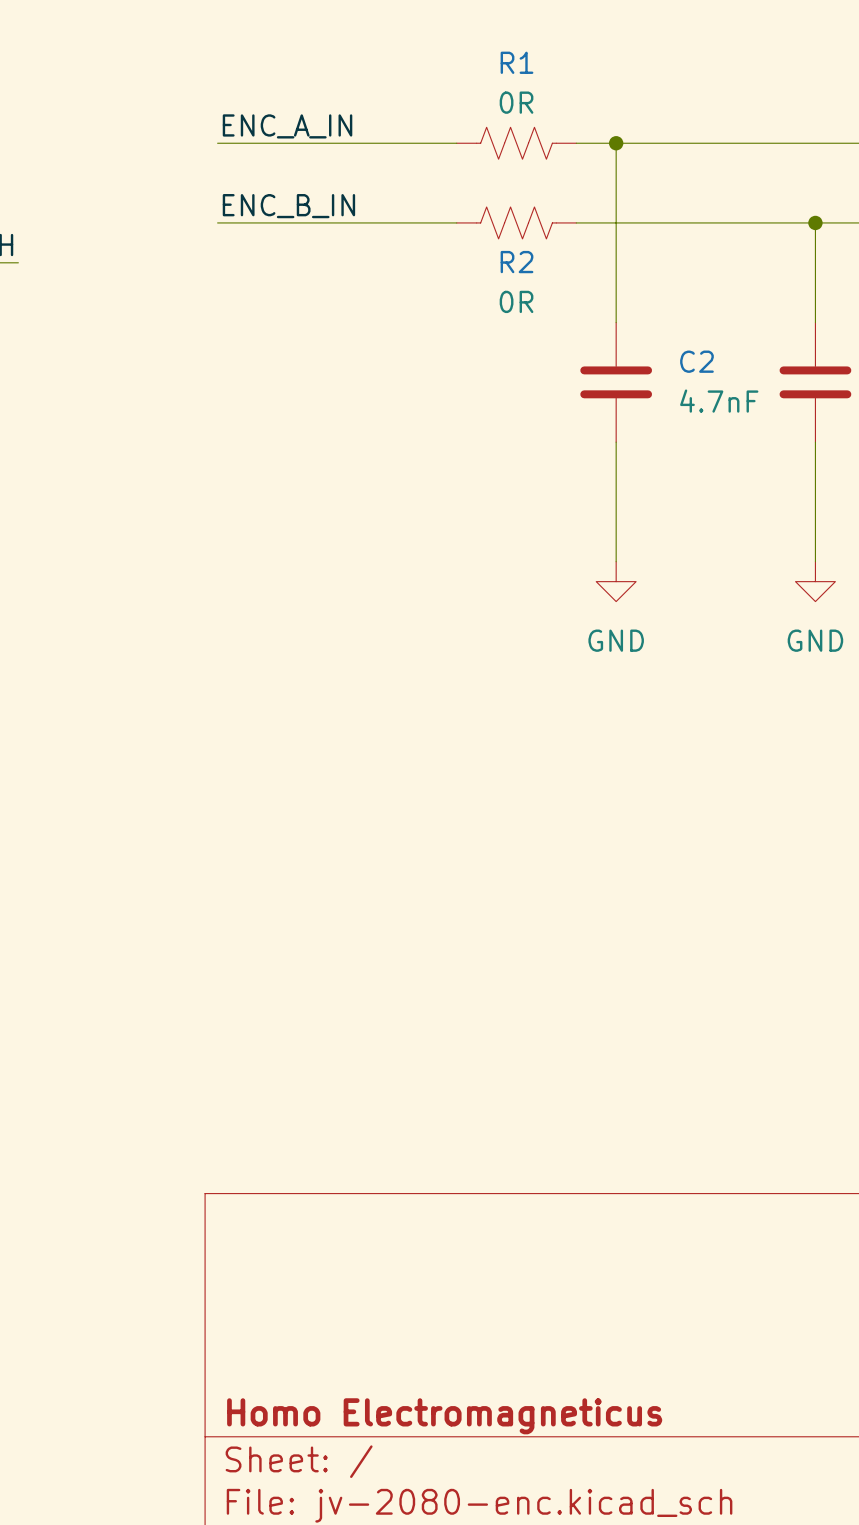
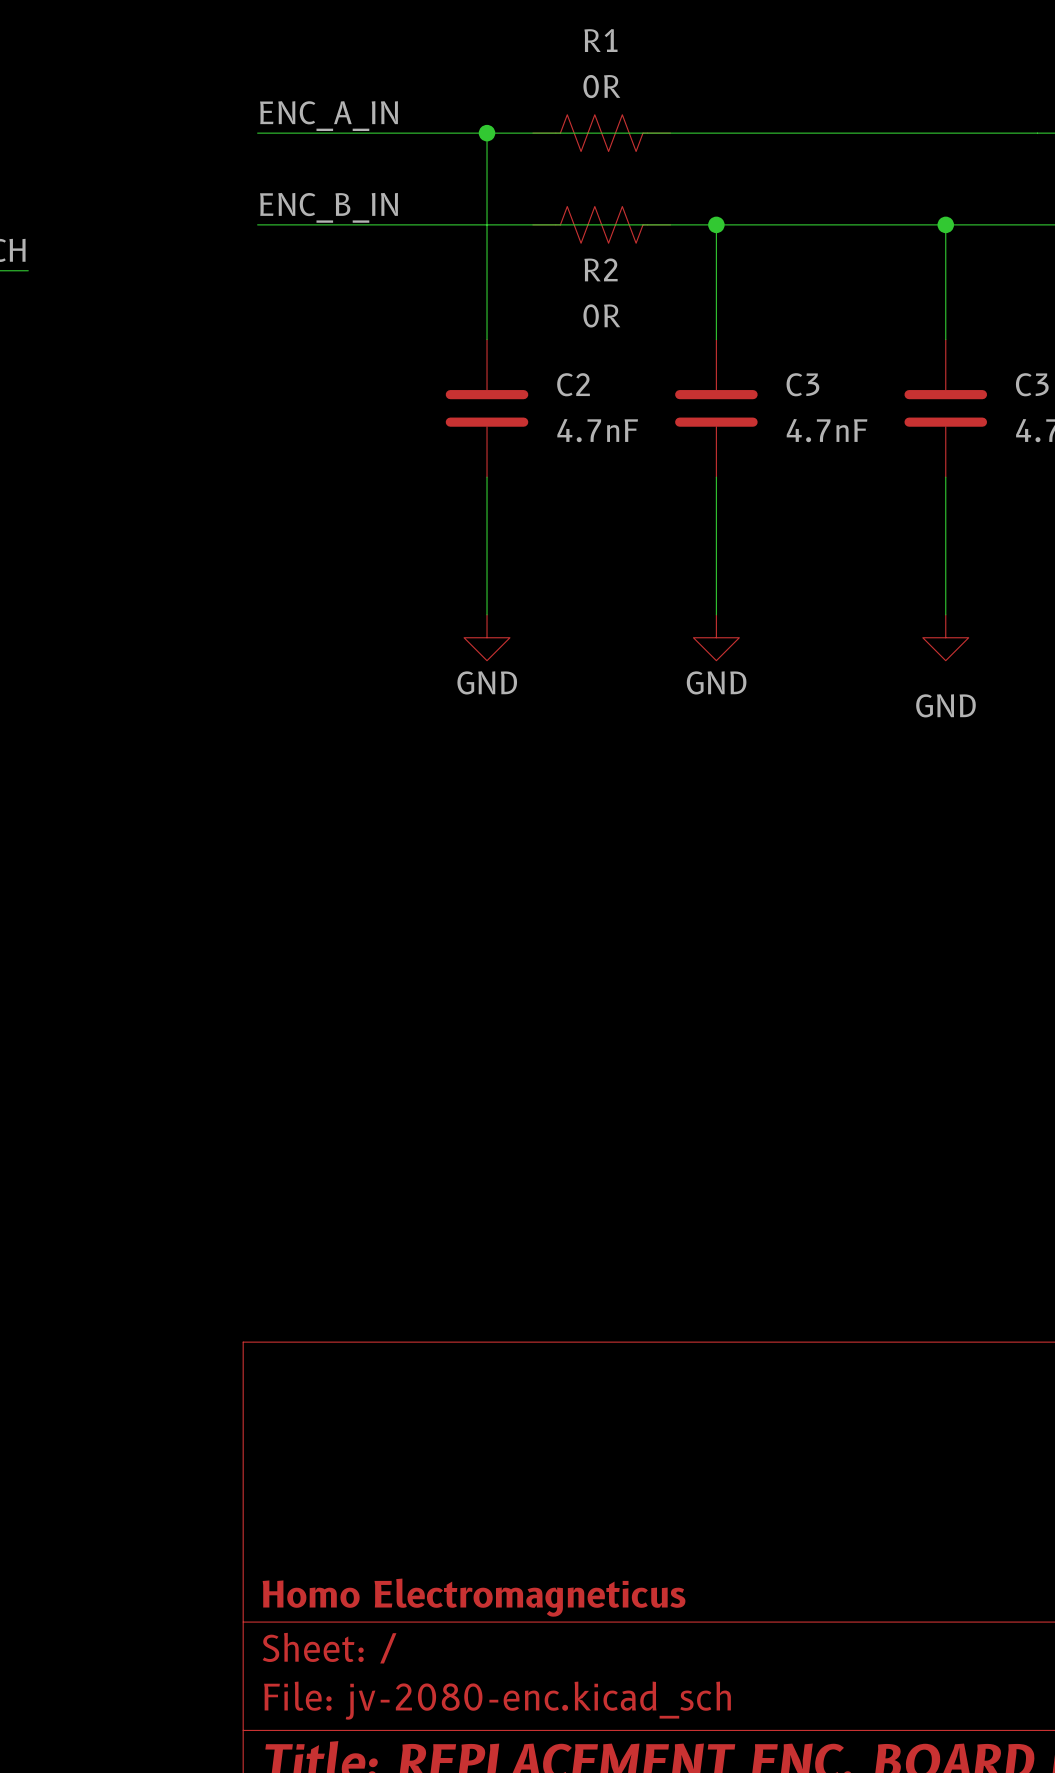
wire: none -> (487, 133) (487, 339)
junction: none -> (487, 133)
wire: none -> (532, 133) (670, 133)
wire: (616, 143) (616, 222) -> none
junction position: (616, 143) -> (716, 224)
wire: none -> (532, 224) (670, 224)
C2 name: C2 (696, 361) -> C3 (802, 384)
C2: none -> 4.7nF (487, 408)
wire: none -> (487, 477) (487, 614)
power symbol: none -> GND (487, 637)
power symbol text position: GND (616, 640) -> GND (716, 682)

